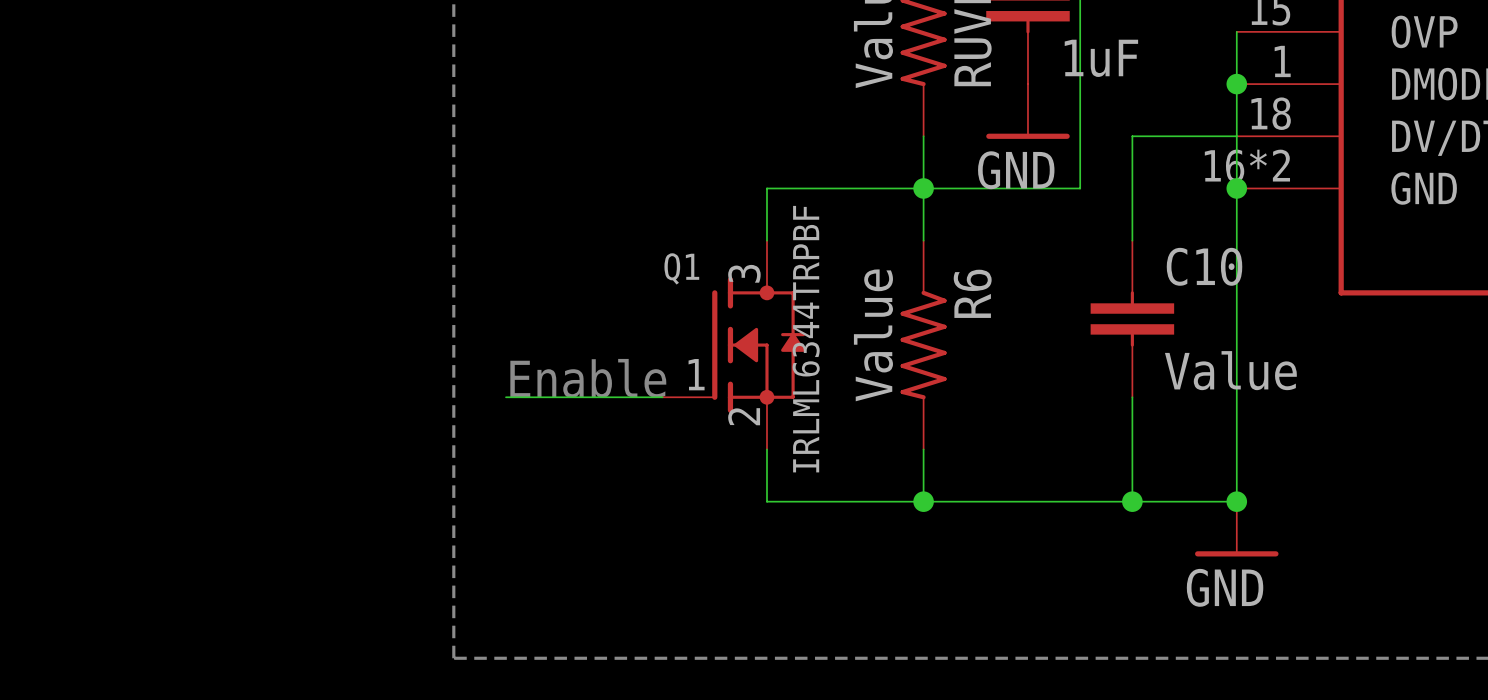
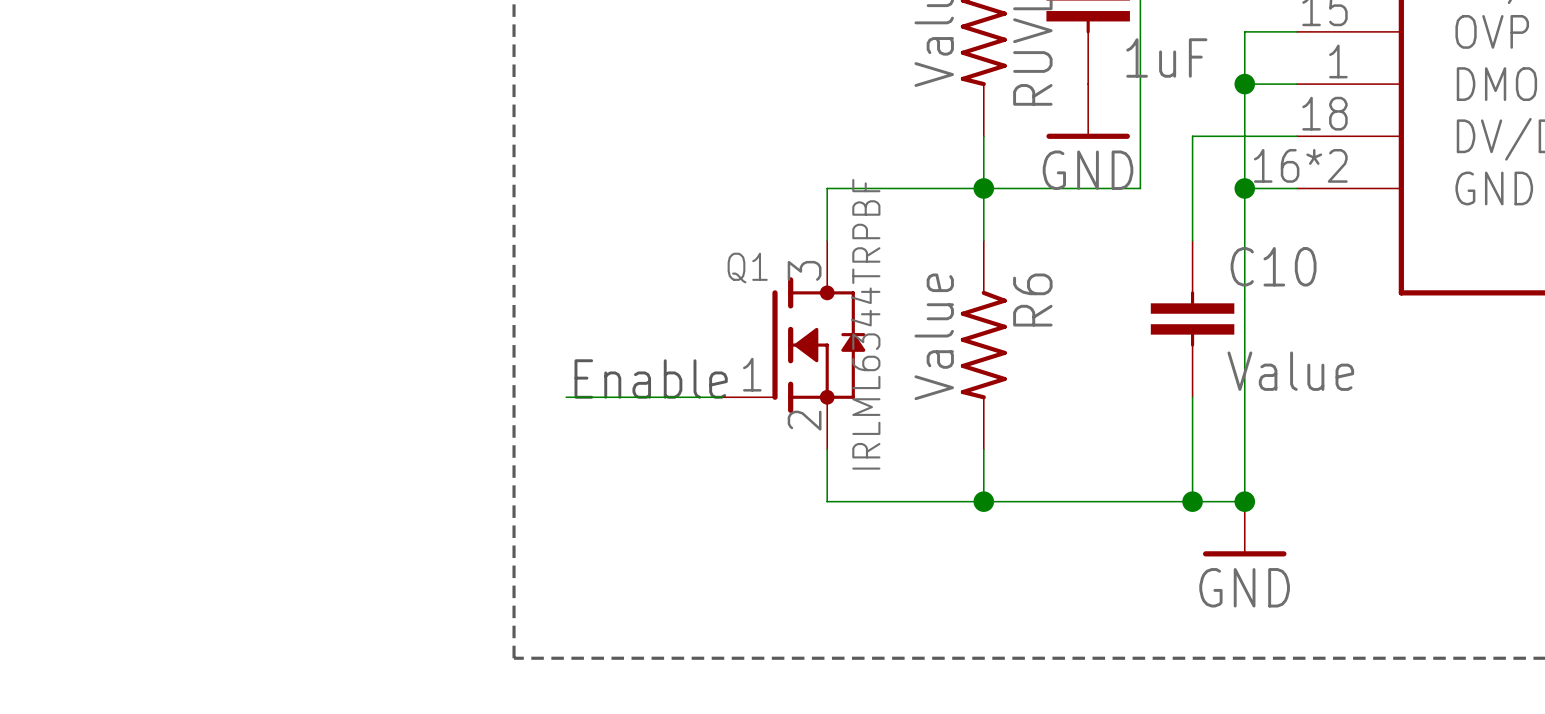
wire: (1236, 31) (1236, 501) (1184, 501) -> (1296, 31) (1244, 31) (1244, 501)
wire: none -> (1244, 84) (1296, 84)
junction position: (1236, 84) -> (1244, 84)
wire: none -> (1244, 188) (1296, 188)
junction position: (1236, 188) -> (1244, 188)
junction position: (1236, 501) -> (1244, 501)
power symbol position: GND (1236, 529) -> GND (1244, 529)

